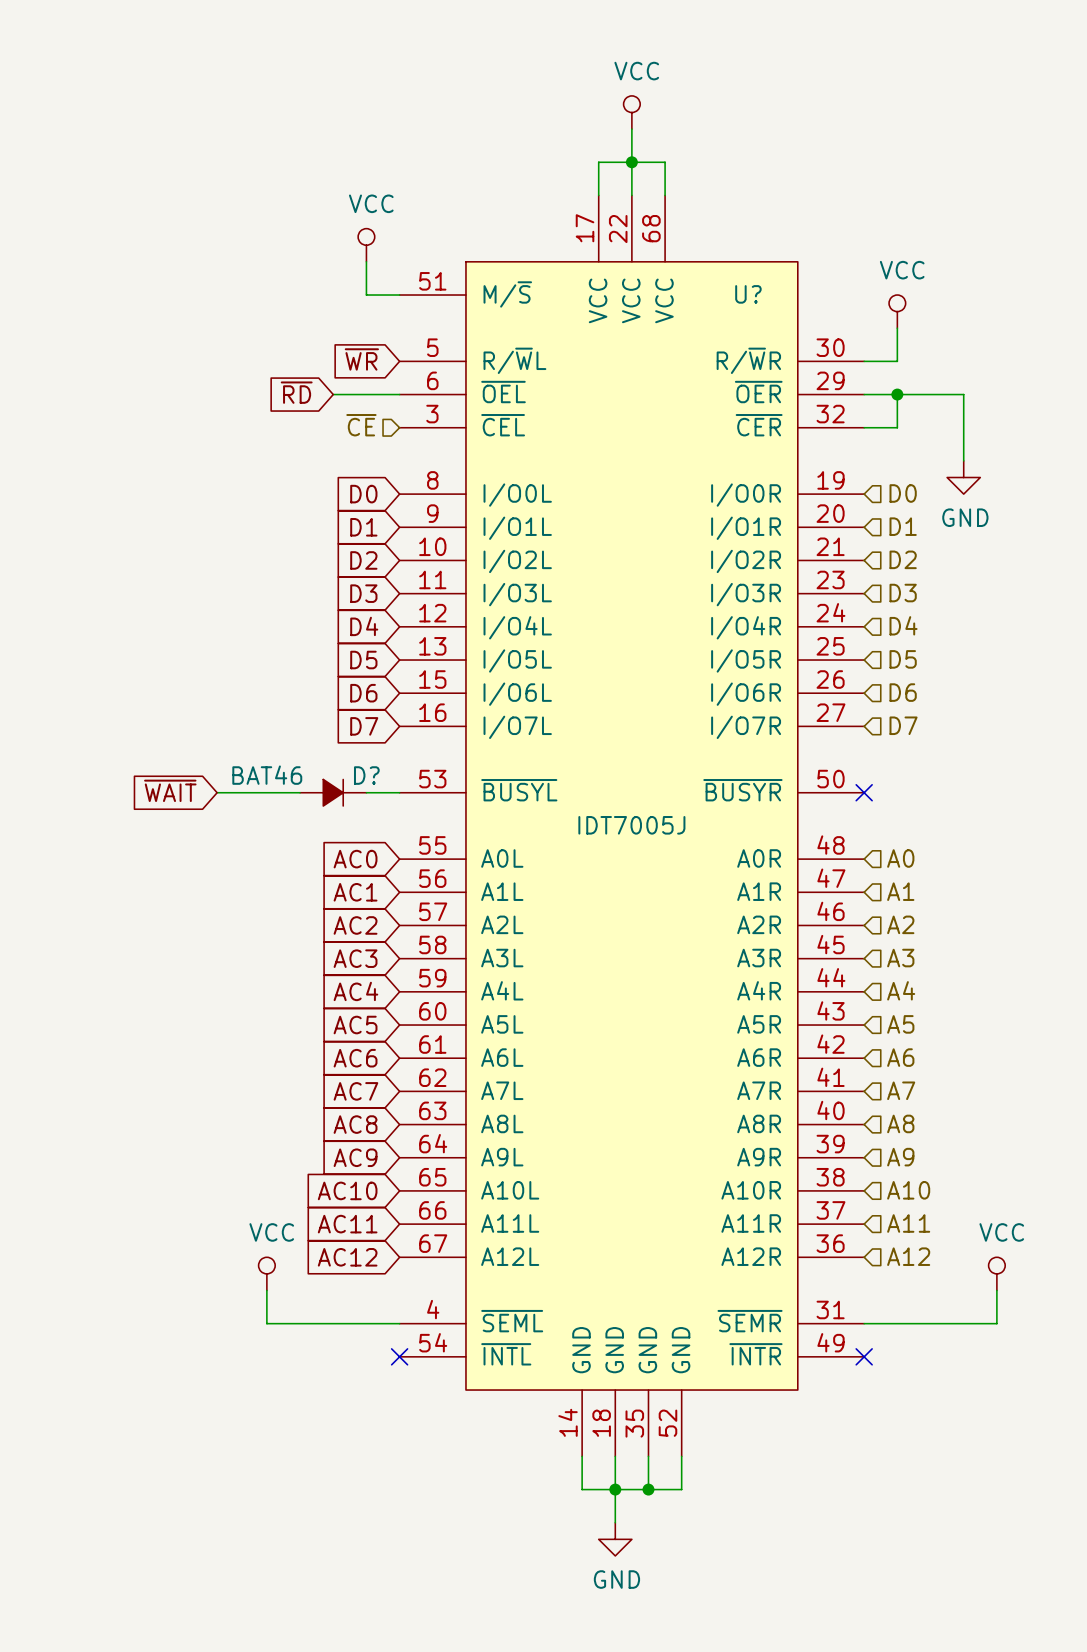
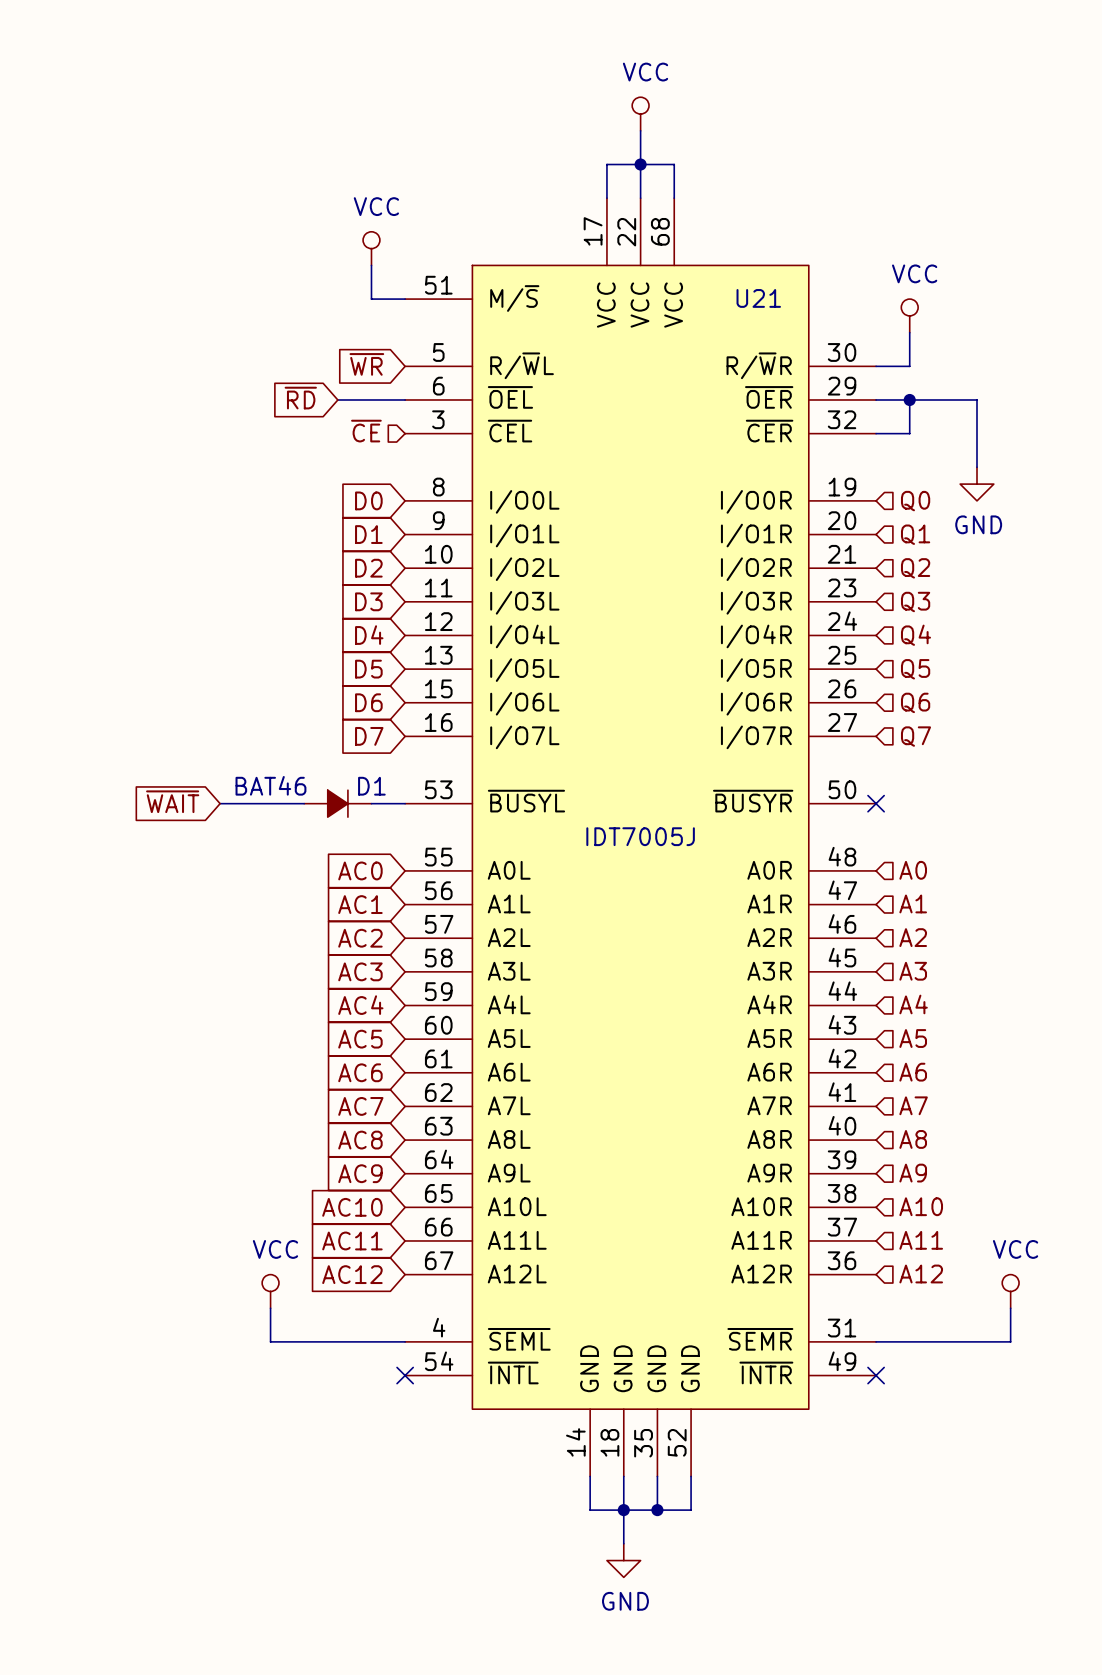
U? name: U? (748, 294) -> U21 (758, 298)
hierarchical label: D0 (903, 493) -> Q0 (915, 501)
hierarchical label: D1 (903, 526) -> Q1 (915, 534)
hierarchical label: D2 (903, 559) -> Q2 (915, 568)
hierarchical label: D3 (903, 593) -> Q3 (915, 602)
hierarchical label: D4 (903, 625) -> Q4 (915, 635)
hierarchical label: D5 (903, 659) -> Q5 (915, 669)
hierarchical label: D6 (903, 692) -> Q6 (915, 702)
hierarchical label: D7 (903, 725) -> Q7 (915, 736)
D? name: D? (366, 775) -> D1 (371, 786)

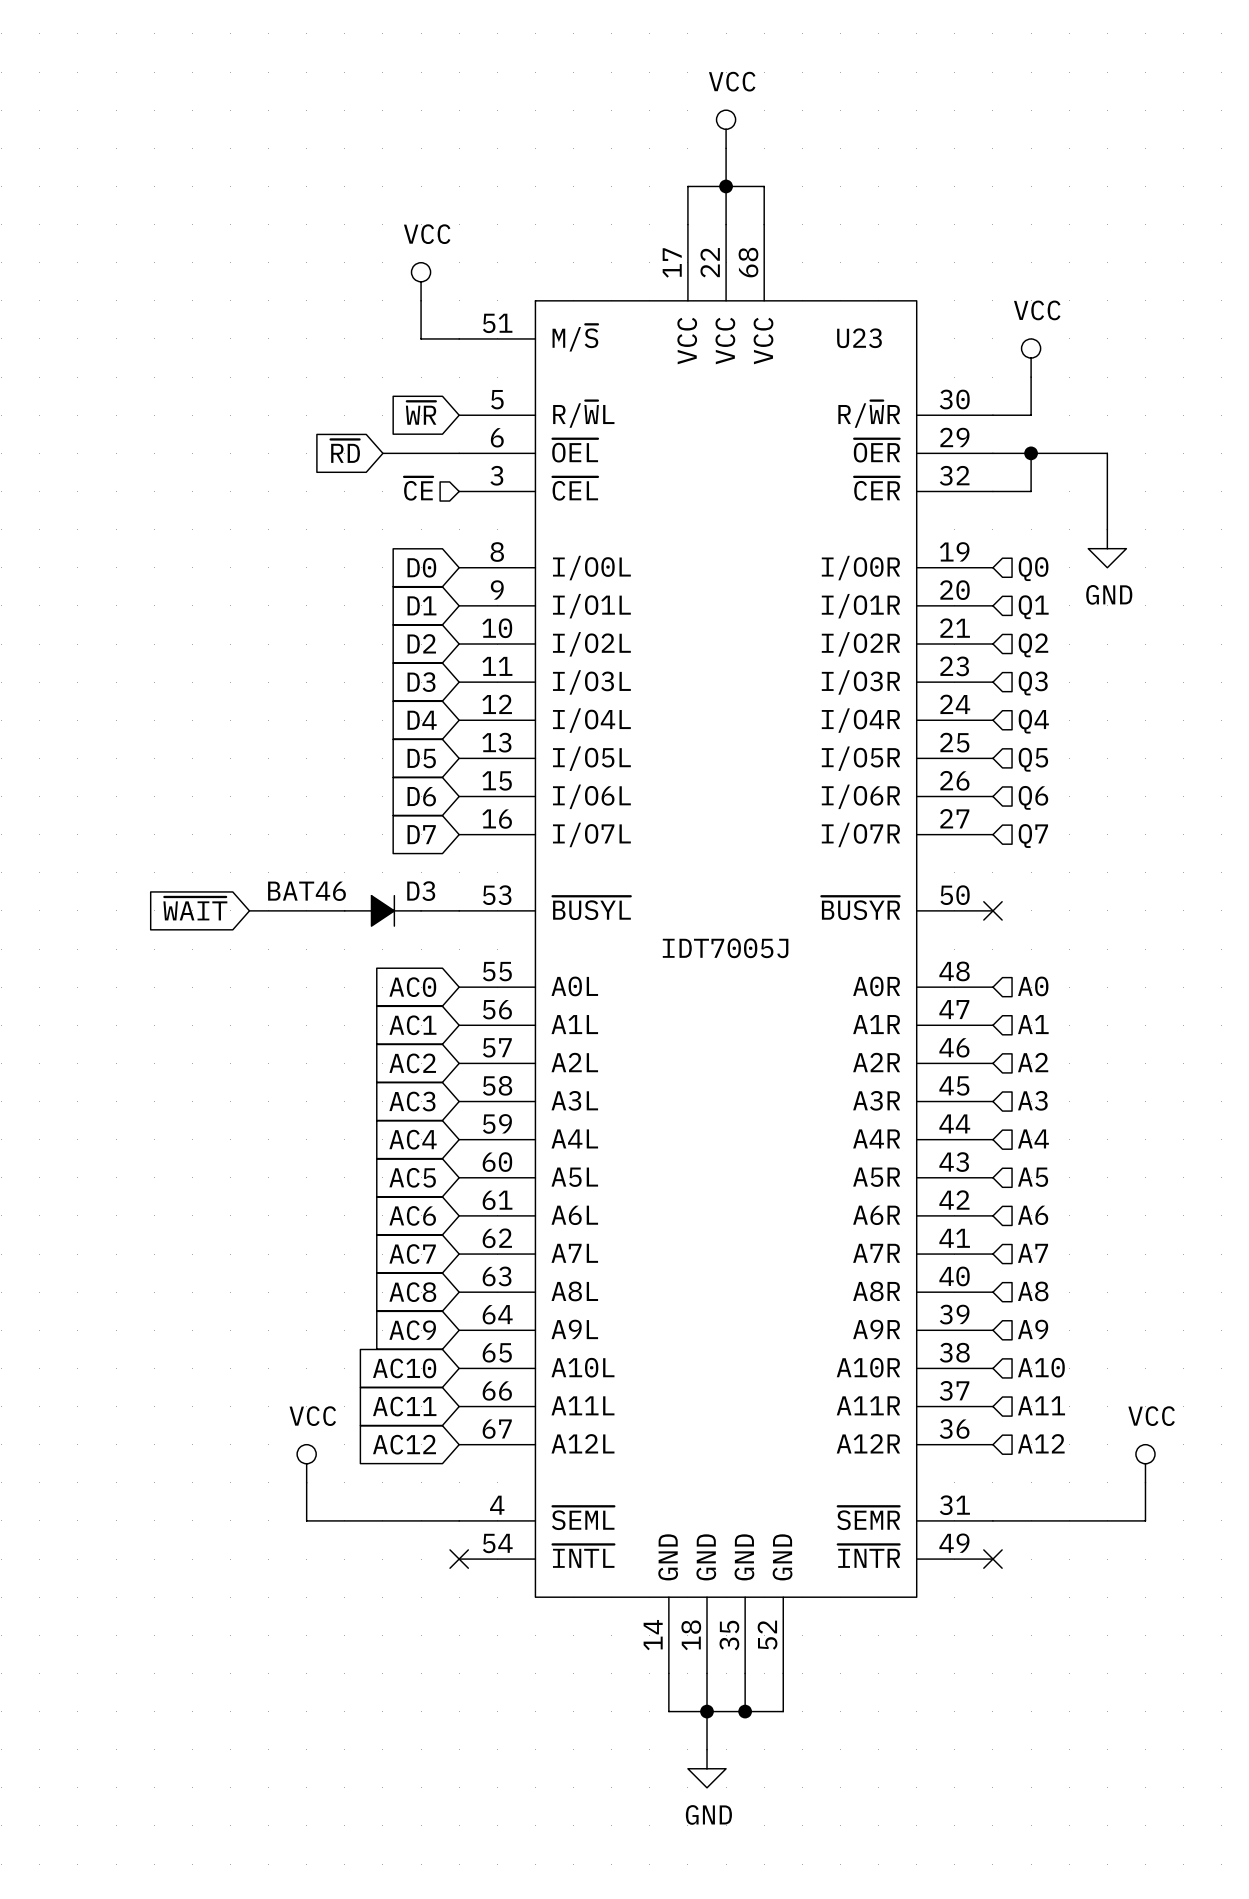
U21 name: U21 (758, 298) -> U23 (859, 338)
D1 name: D1 (371, 786) -> D3 (421, 891)

